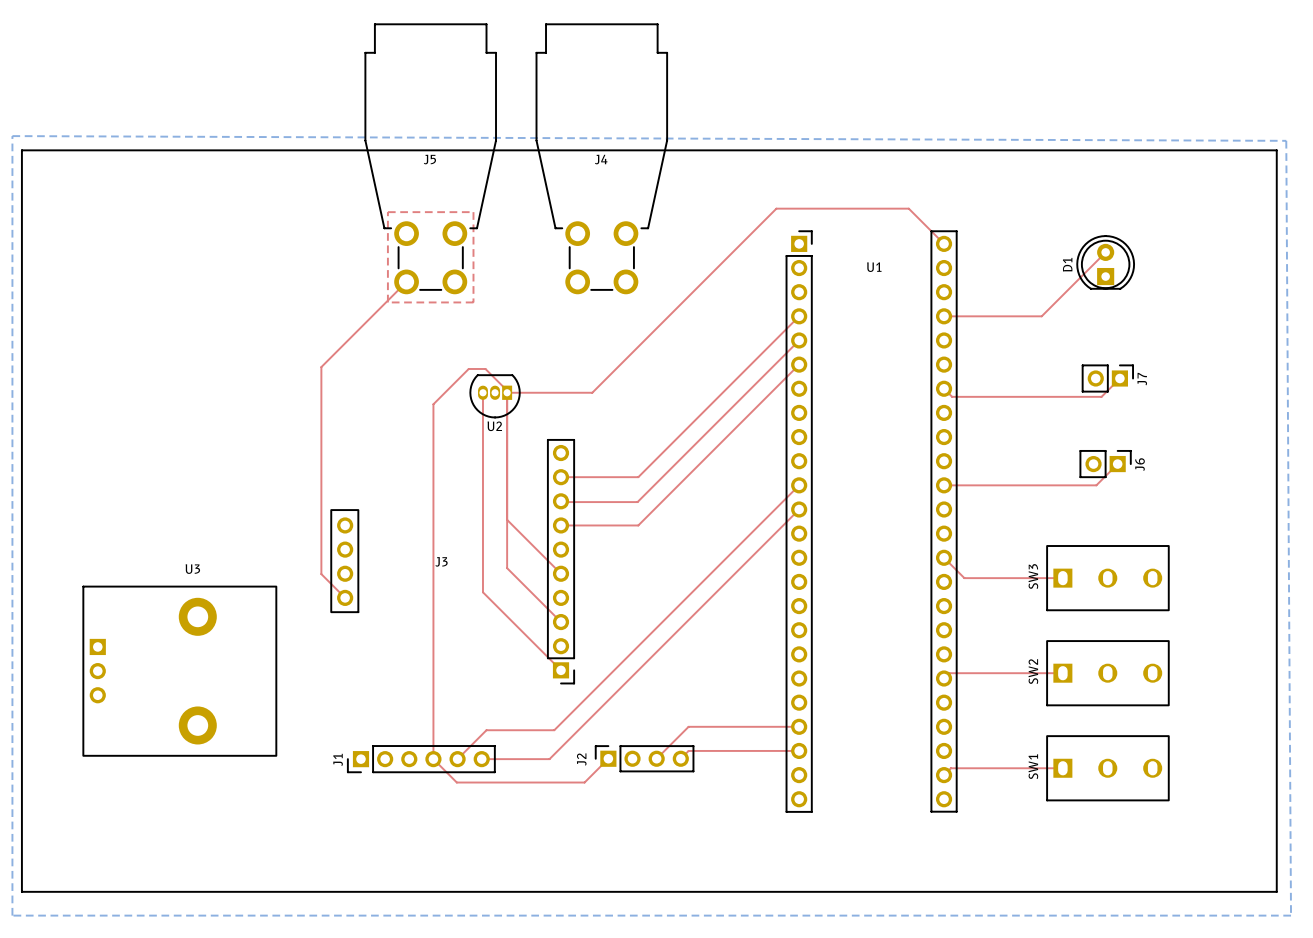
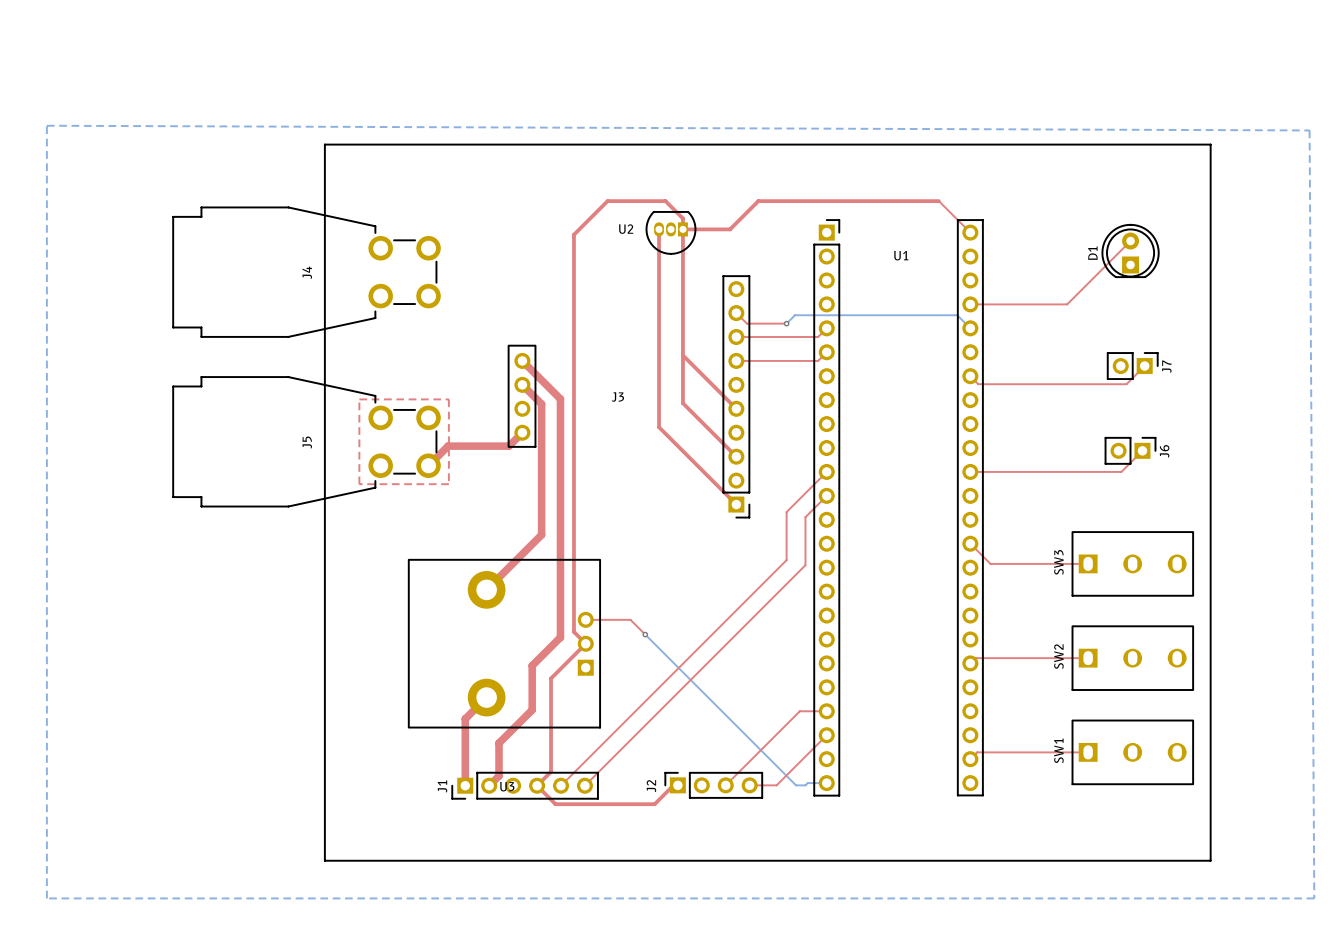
board edge: (21, 150) (1276, 150) (1276, 891) (21, 891) (21, 150) -> (324, 144) (324, 860) (1210, 860) (1210, 144) (324, 144)
J5 rotation: 0° (430, 158) -> 90° counterclockwise (306, 441)
J5 position: (430, 158) -> (306, 441)
J4 rotation: 0° (601, 158) -> 90° counterclockwise (306, 272)
J4 position: (601, 158) -> (306, 272)
top zone outline: (387, 212) (473, 212) (473, 302) (387, 302) (387, 212) -> none
top track: (912, 212) (908, 208) (776, 208) (592, 392) (507, 392) -> (938, 201) (758, 201) (730, 229) (682, 229)
top track: (406, 281) (321, 367) (321, 574) (345, 597) -> none
top track: (799, 316) (638, 477) (561, 477) -> none
top track: none -> (736, 313) (746, 323) (786, 323)
bottom track: none -> (786, 323) (794, 315) (957, 315) (970, 328)
via: none -> (786, 323)
top track: (790, 349) (637, 502) (561, 501) -> (818, 337) (736, 337)
top track: none -> (522, 360) (560, 399) (560, 637) (532, 665) (532, 709) (499, 743) (499, 775) (489, 785)
top track: (790, 373) (638, 525) (561, 525) -> (818, 360) (736, 360)
top track: (482, 392) (482, 592) (561, 670) -> (659, 229) (659, 427) (736, 504)
U2 position: (495, 396) -> (670, 232)
top track: none -> (522, 384) (541, 404) (541, 534) (486, 589)
top zone outline: none -> (359, 399) (359, 484) (448, 484) (448, 399) (359, 399)
U2 name position: U2 (494, 426) -> U2 (626, 229)
top track: none -> (522, 432) (509, 446) (448, 446) (428, 465)
top track: none -> (736, 456) (682, 403) (682, 218) (665, 201) (607, 201) (573, 234) (573, 631) (585, 643) (551, 678) (551, 771) (537, 785) (555, 804) (654, 804) (673, 785) (677, 785)
top track: (507, 519) (561, 573) -> (682, 355) (736, 408)
top track: (758, 525) (554, 730) (486, 730) (457, 759) -> (786, 512) (786, 560) (561, 785)
top track: (777, 530) (549, 759) (481, 759) -> (805, 517) (805, 565) (584, 785)
J3 position: (452, 561) -> (629, 396)
U3 name position: U3 (192, 569) -> U3 (507, 786)
top track: (561, 622) (507, 568) (507, 390) (485, 368) (468, 368) (433, 404) (433, 759) (456, 782) (584, 782) (608, 758) -> none
top track: none -> (585, 619) (630, 619) (645, 634)
bottom track: none -> (645, 634) (796, 785) (826, 783)
via: none -> (645, 634)
U3 rotation: 0° (179, 671) -> 180° (504, 643)
U3 position: (179, 671) -> (504, 643)
top track: none -> (486, 697) (465, 718) (465, 785)
top track: (771, 726) (688, 726) (656, 758) -> (799, 711) (725, 785)
top track: (799, 750) (688, 750) (680, 758) -> (826, 735) (776, 785) (749, 785)
J2 position: (644, 758) -> (713, 785)
J1 position: (421, 759) -> (525, 785)

